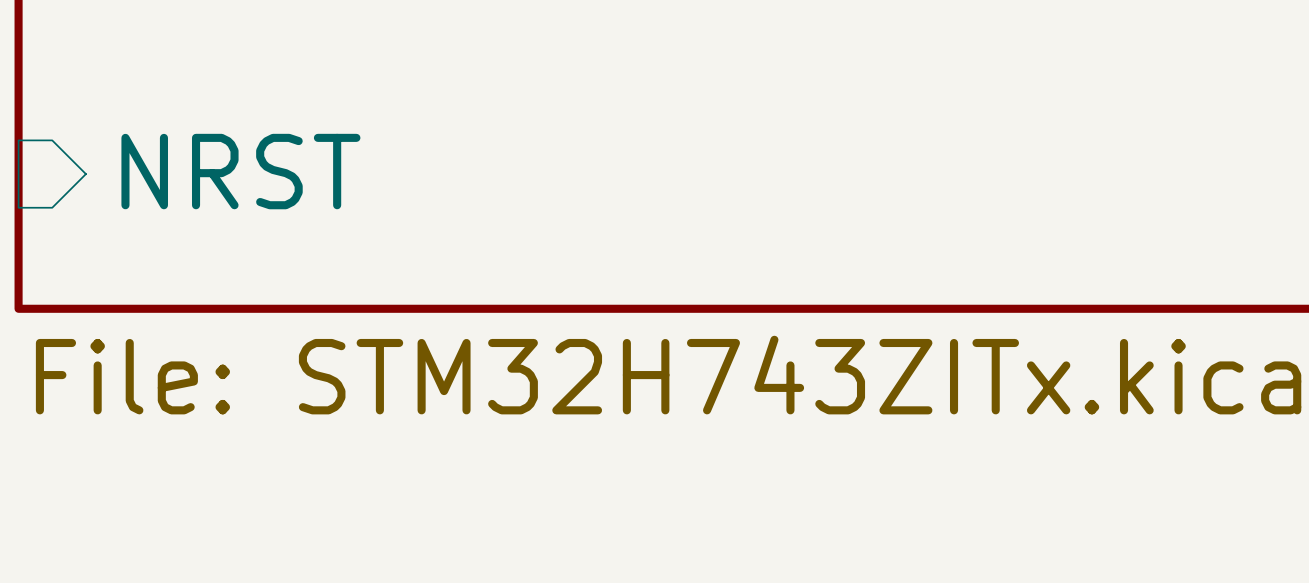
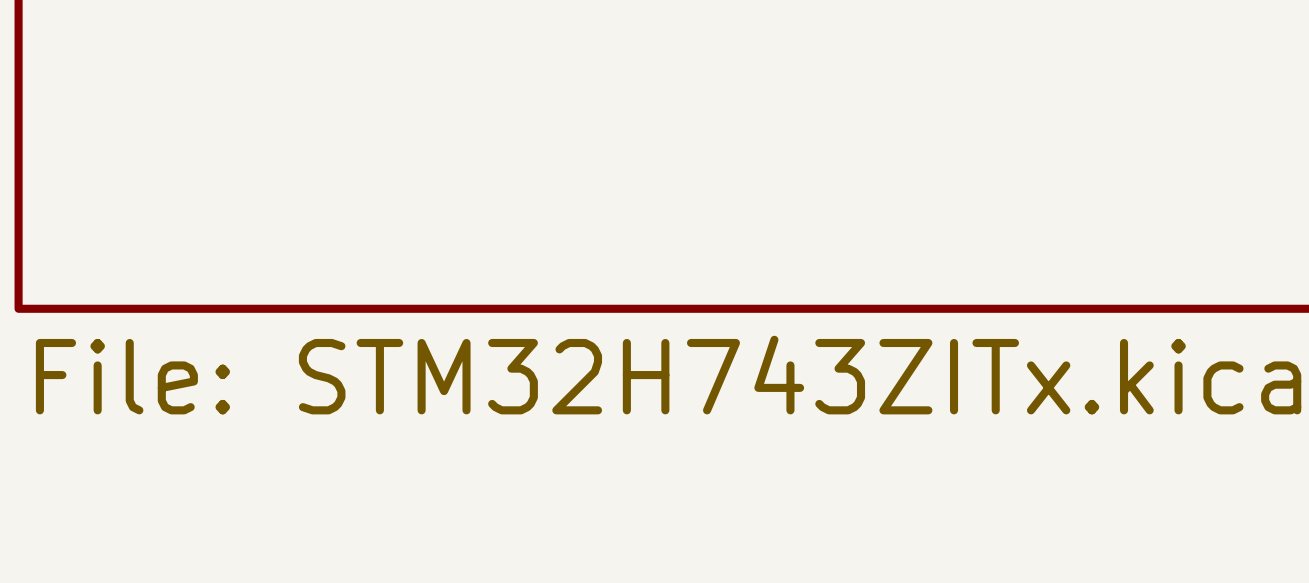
sheet pin: NRST (240, 171) -> none

